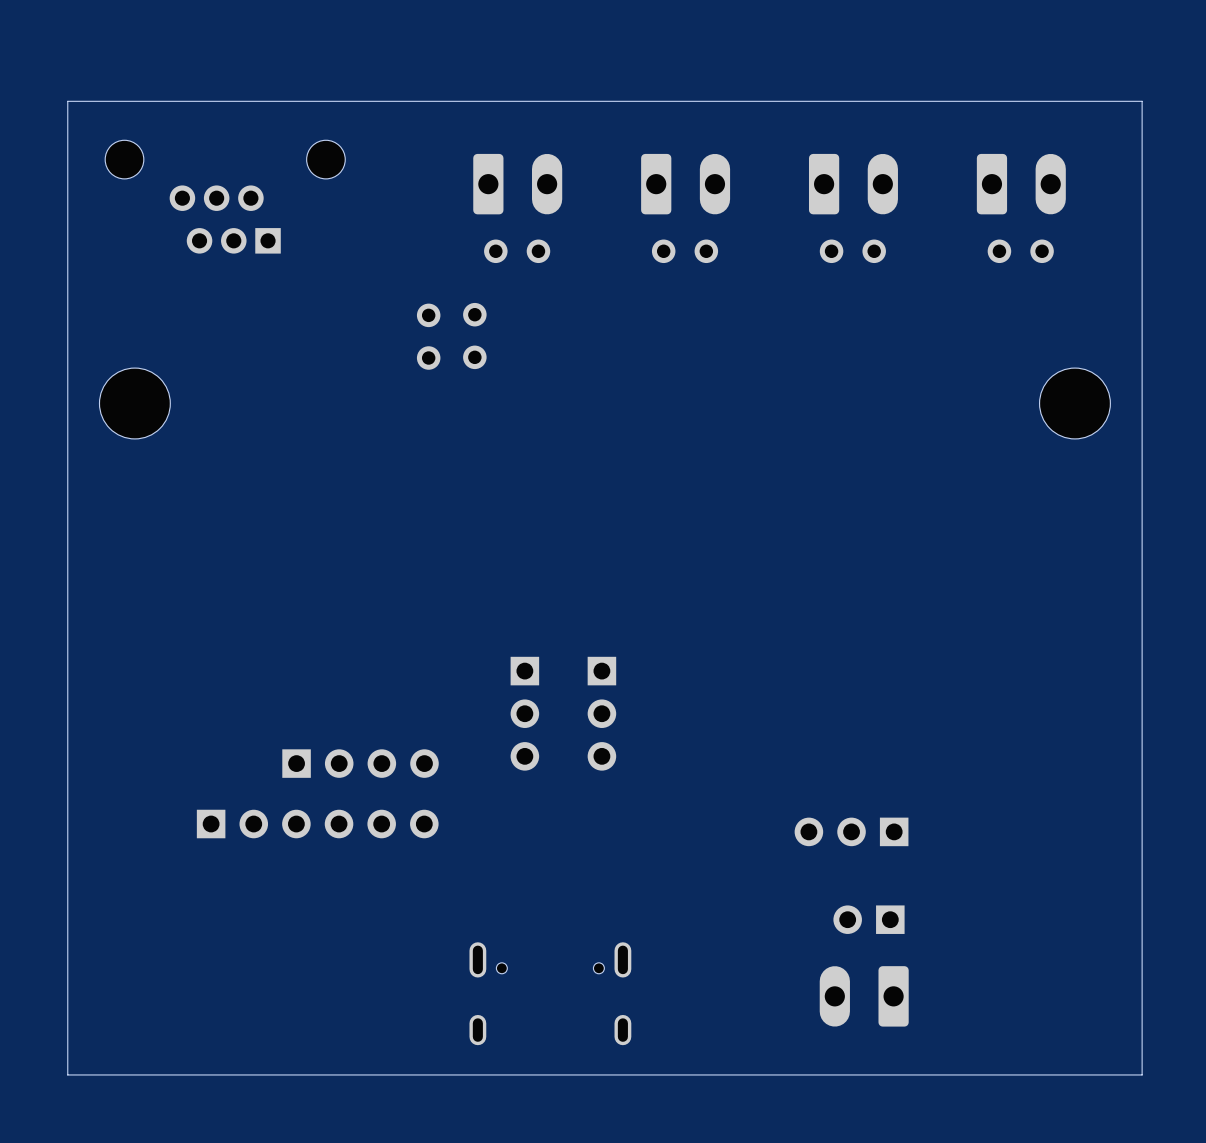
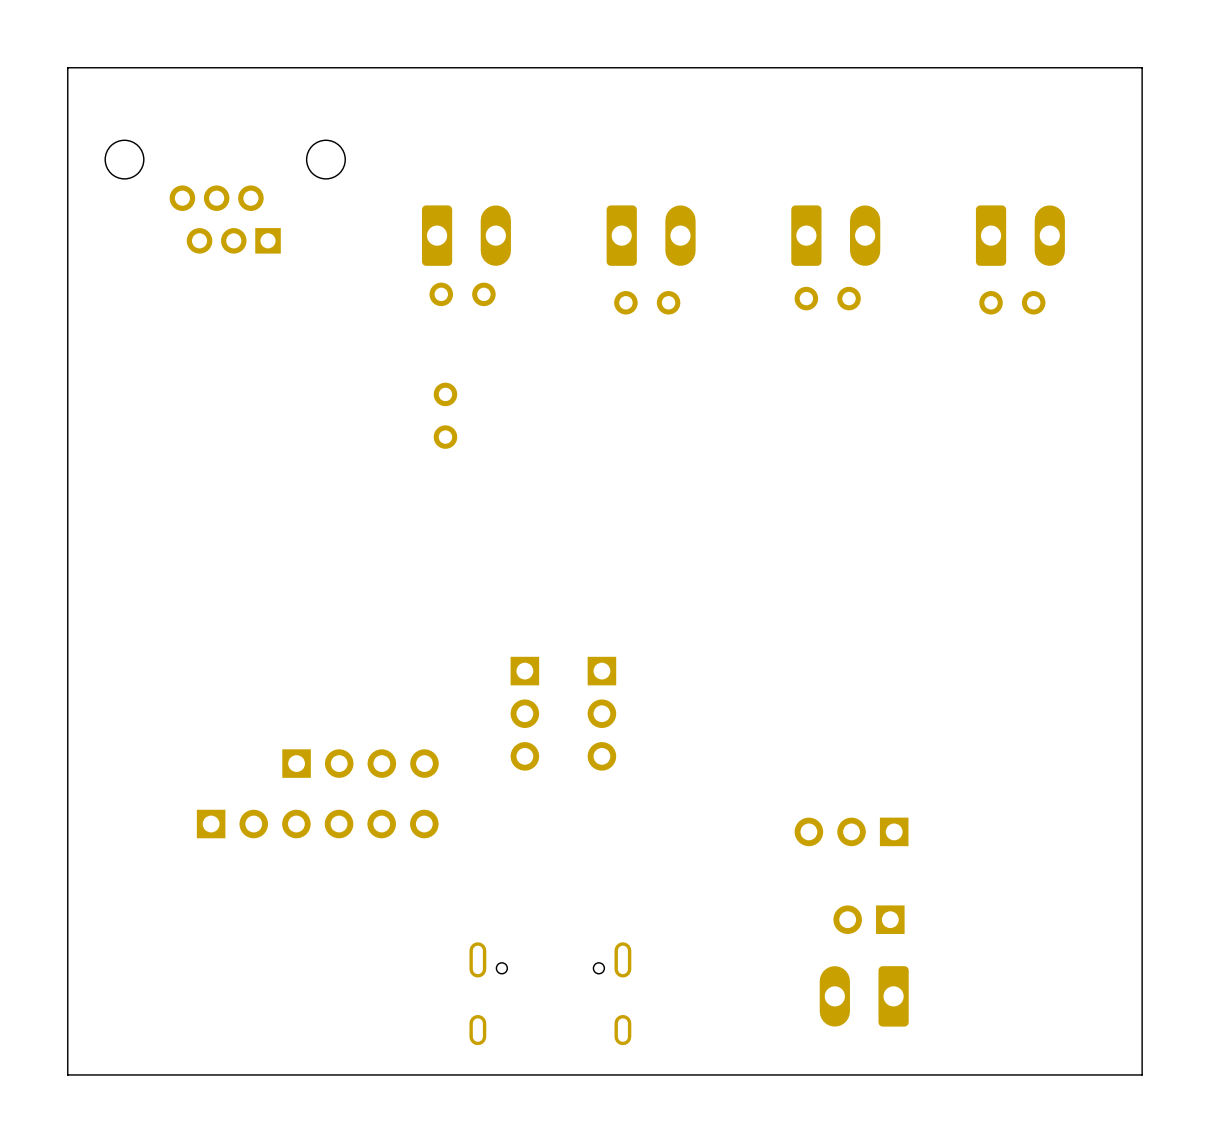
board edge: (1142, 101) (67, 101) -> (1142, 101) (1142, 67) (67, 67) (67, 101)
part: (517, 184) -> none
part position: (685, 184) -> (651, 235)
part position: (853, 184) -> (835, 235)
part: (1021, 184) -> none
part: none -> (466, 235)
part footprint: [987, 239, 1054, 264] -> [975, 205, 1065, 266]
part: (517, 251) -> none
part position: (685, 251) -> (647, 302)
part position: (852, 251) -> (827, 298)
part: none -> (462, 294)
part: none -> (1012, 302)
part: (428, 336) -> none
part: (474, 336) -> none
part: (134, 403) -> none
part: (1074, 403) -> none
part: none -> (445, 415)

